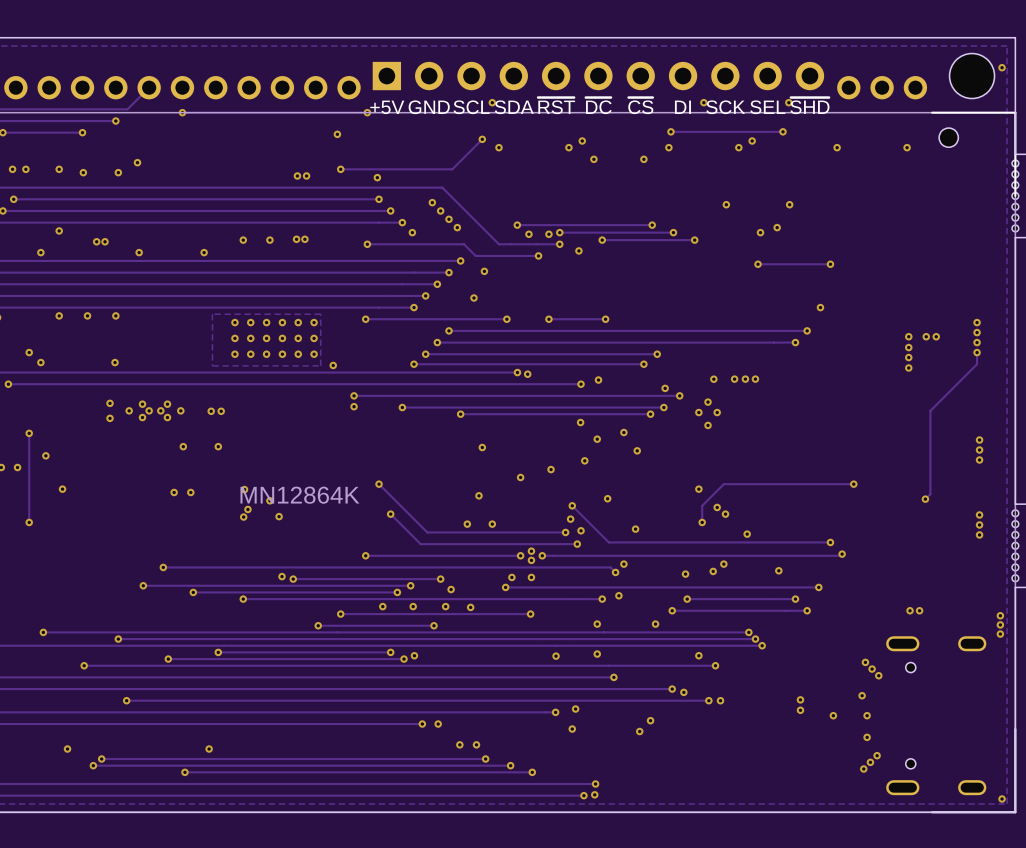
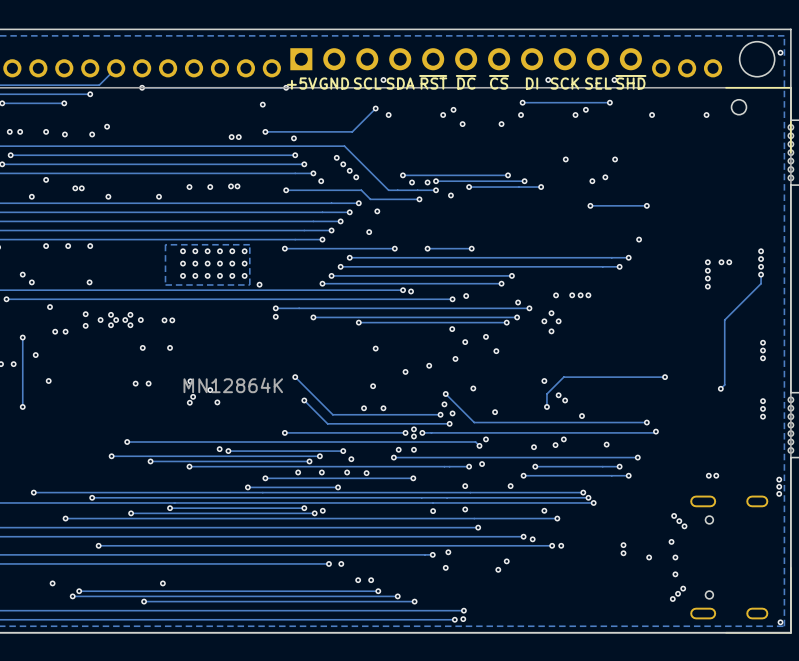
via: none -> (50, 307)
via: none -> (55, 331)
via: none -> (65, 331)

